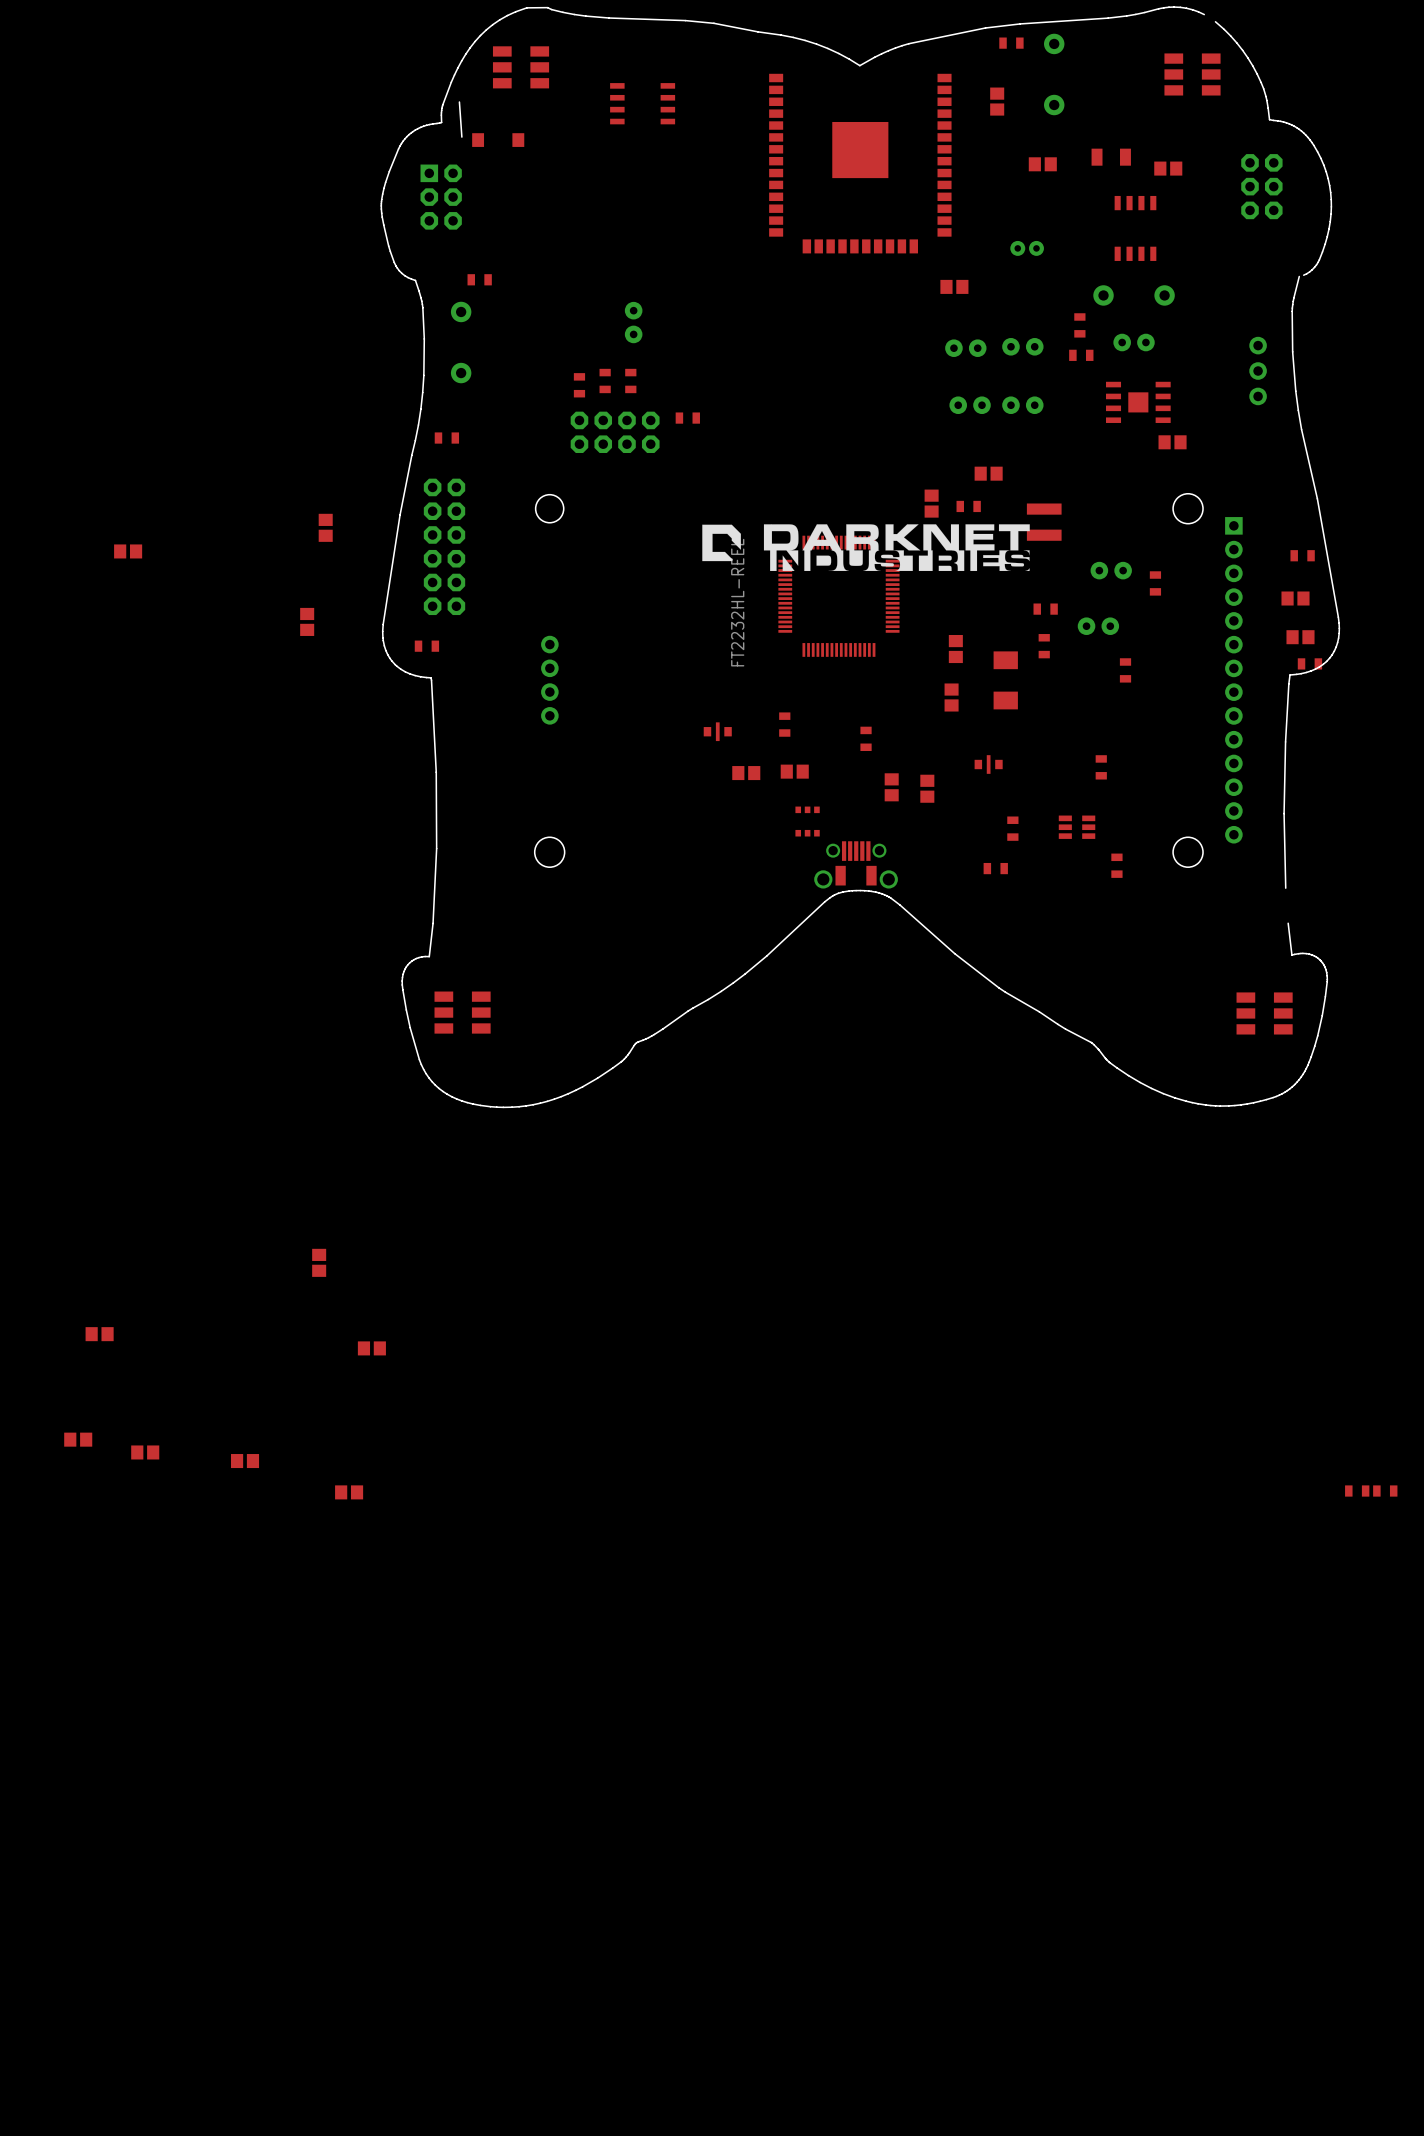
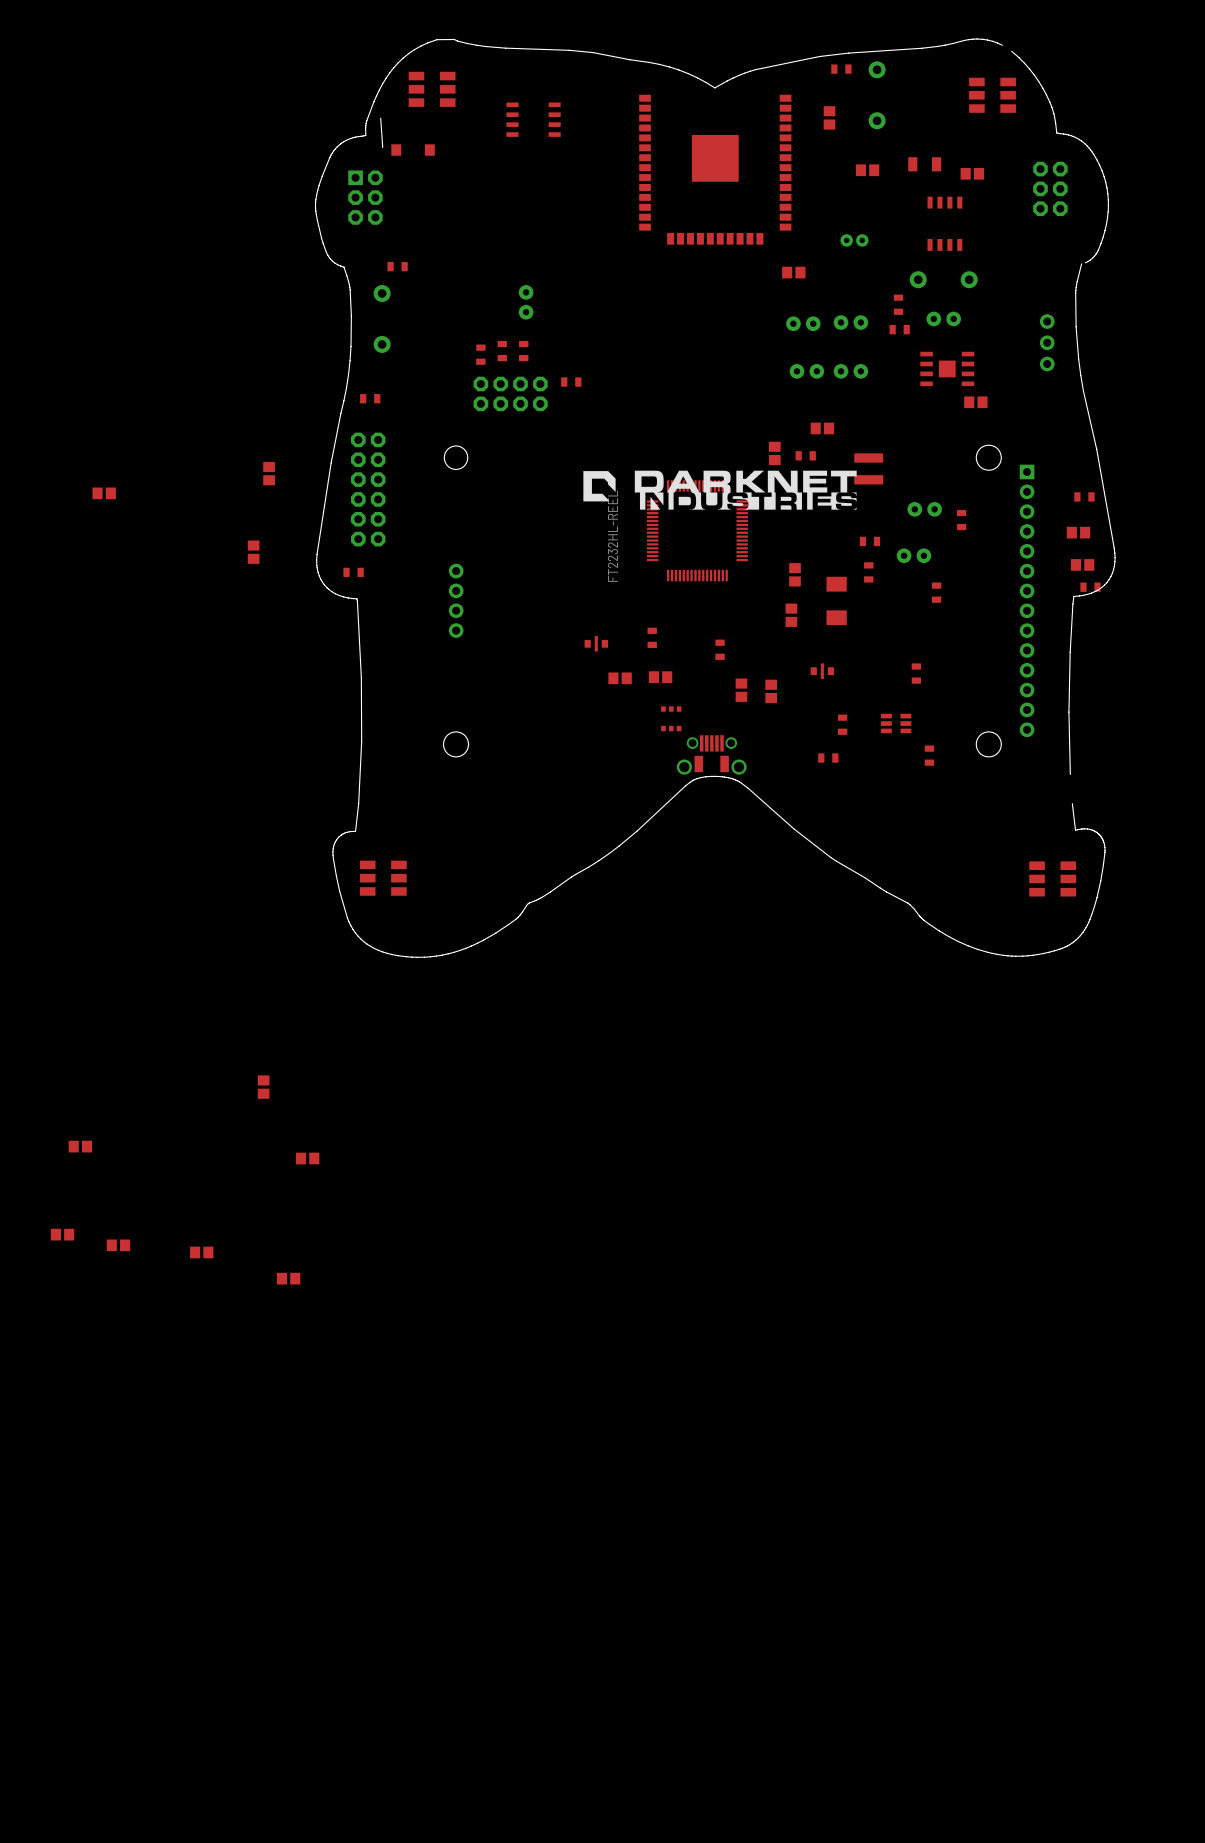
part: (1357, 1491) -> none
part: (1385, 1491) -> none

